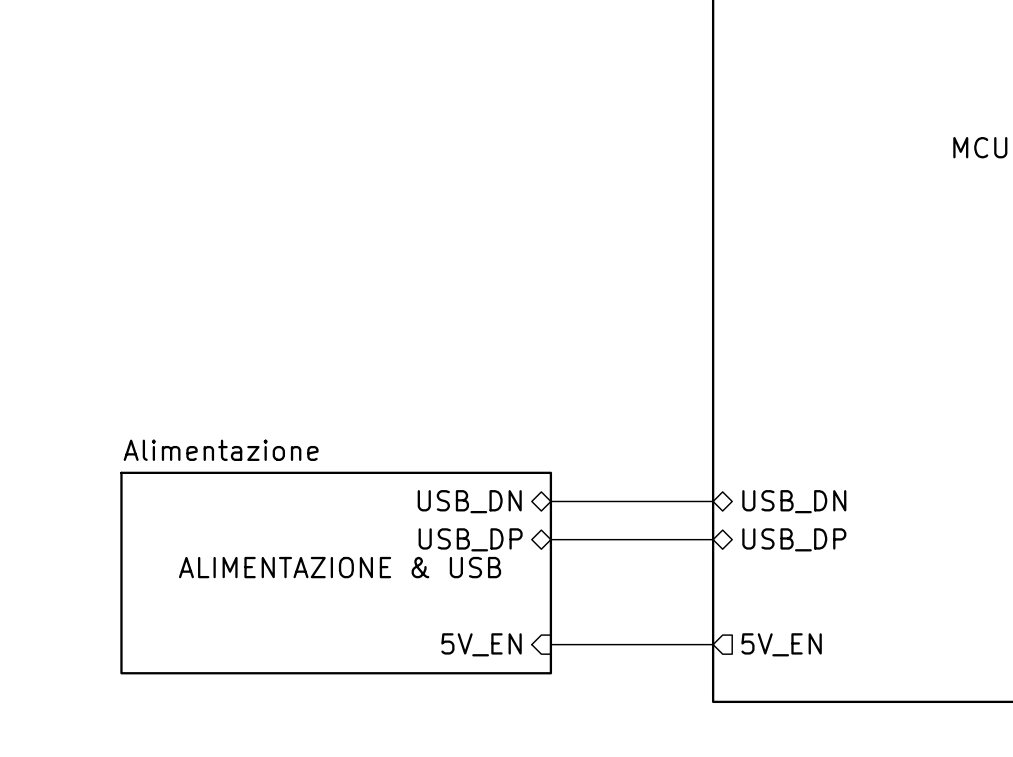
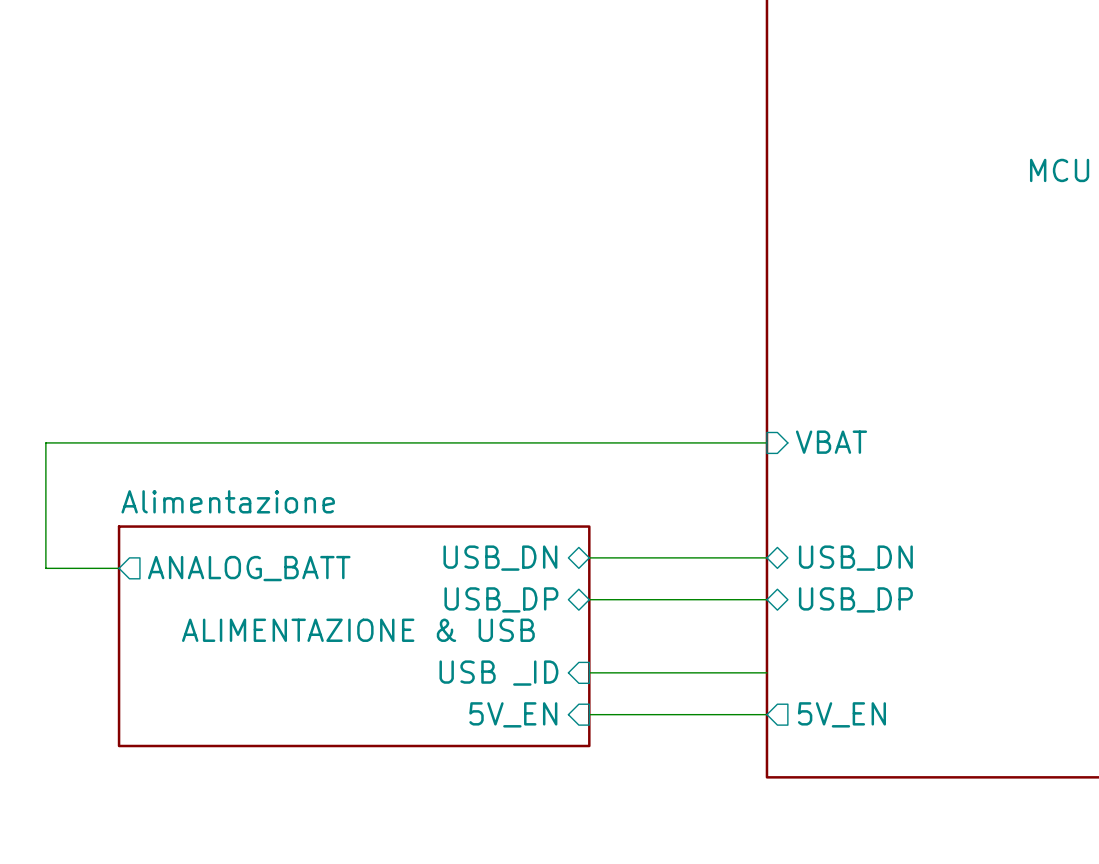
sheet pin: none -> VBAT (831, 442)
wire: none -> (766, 442) (45, 442) (45, 568) (119, 568)
sheet pin: none -> ANALOG_BATT (249, 568)
sheet pin: none -> USB _ID (498, 673)
wire: none -> (589, 672) (766, 672)

